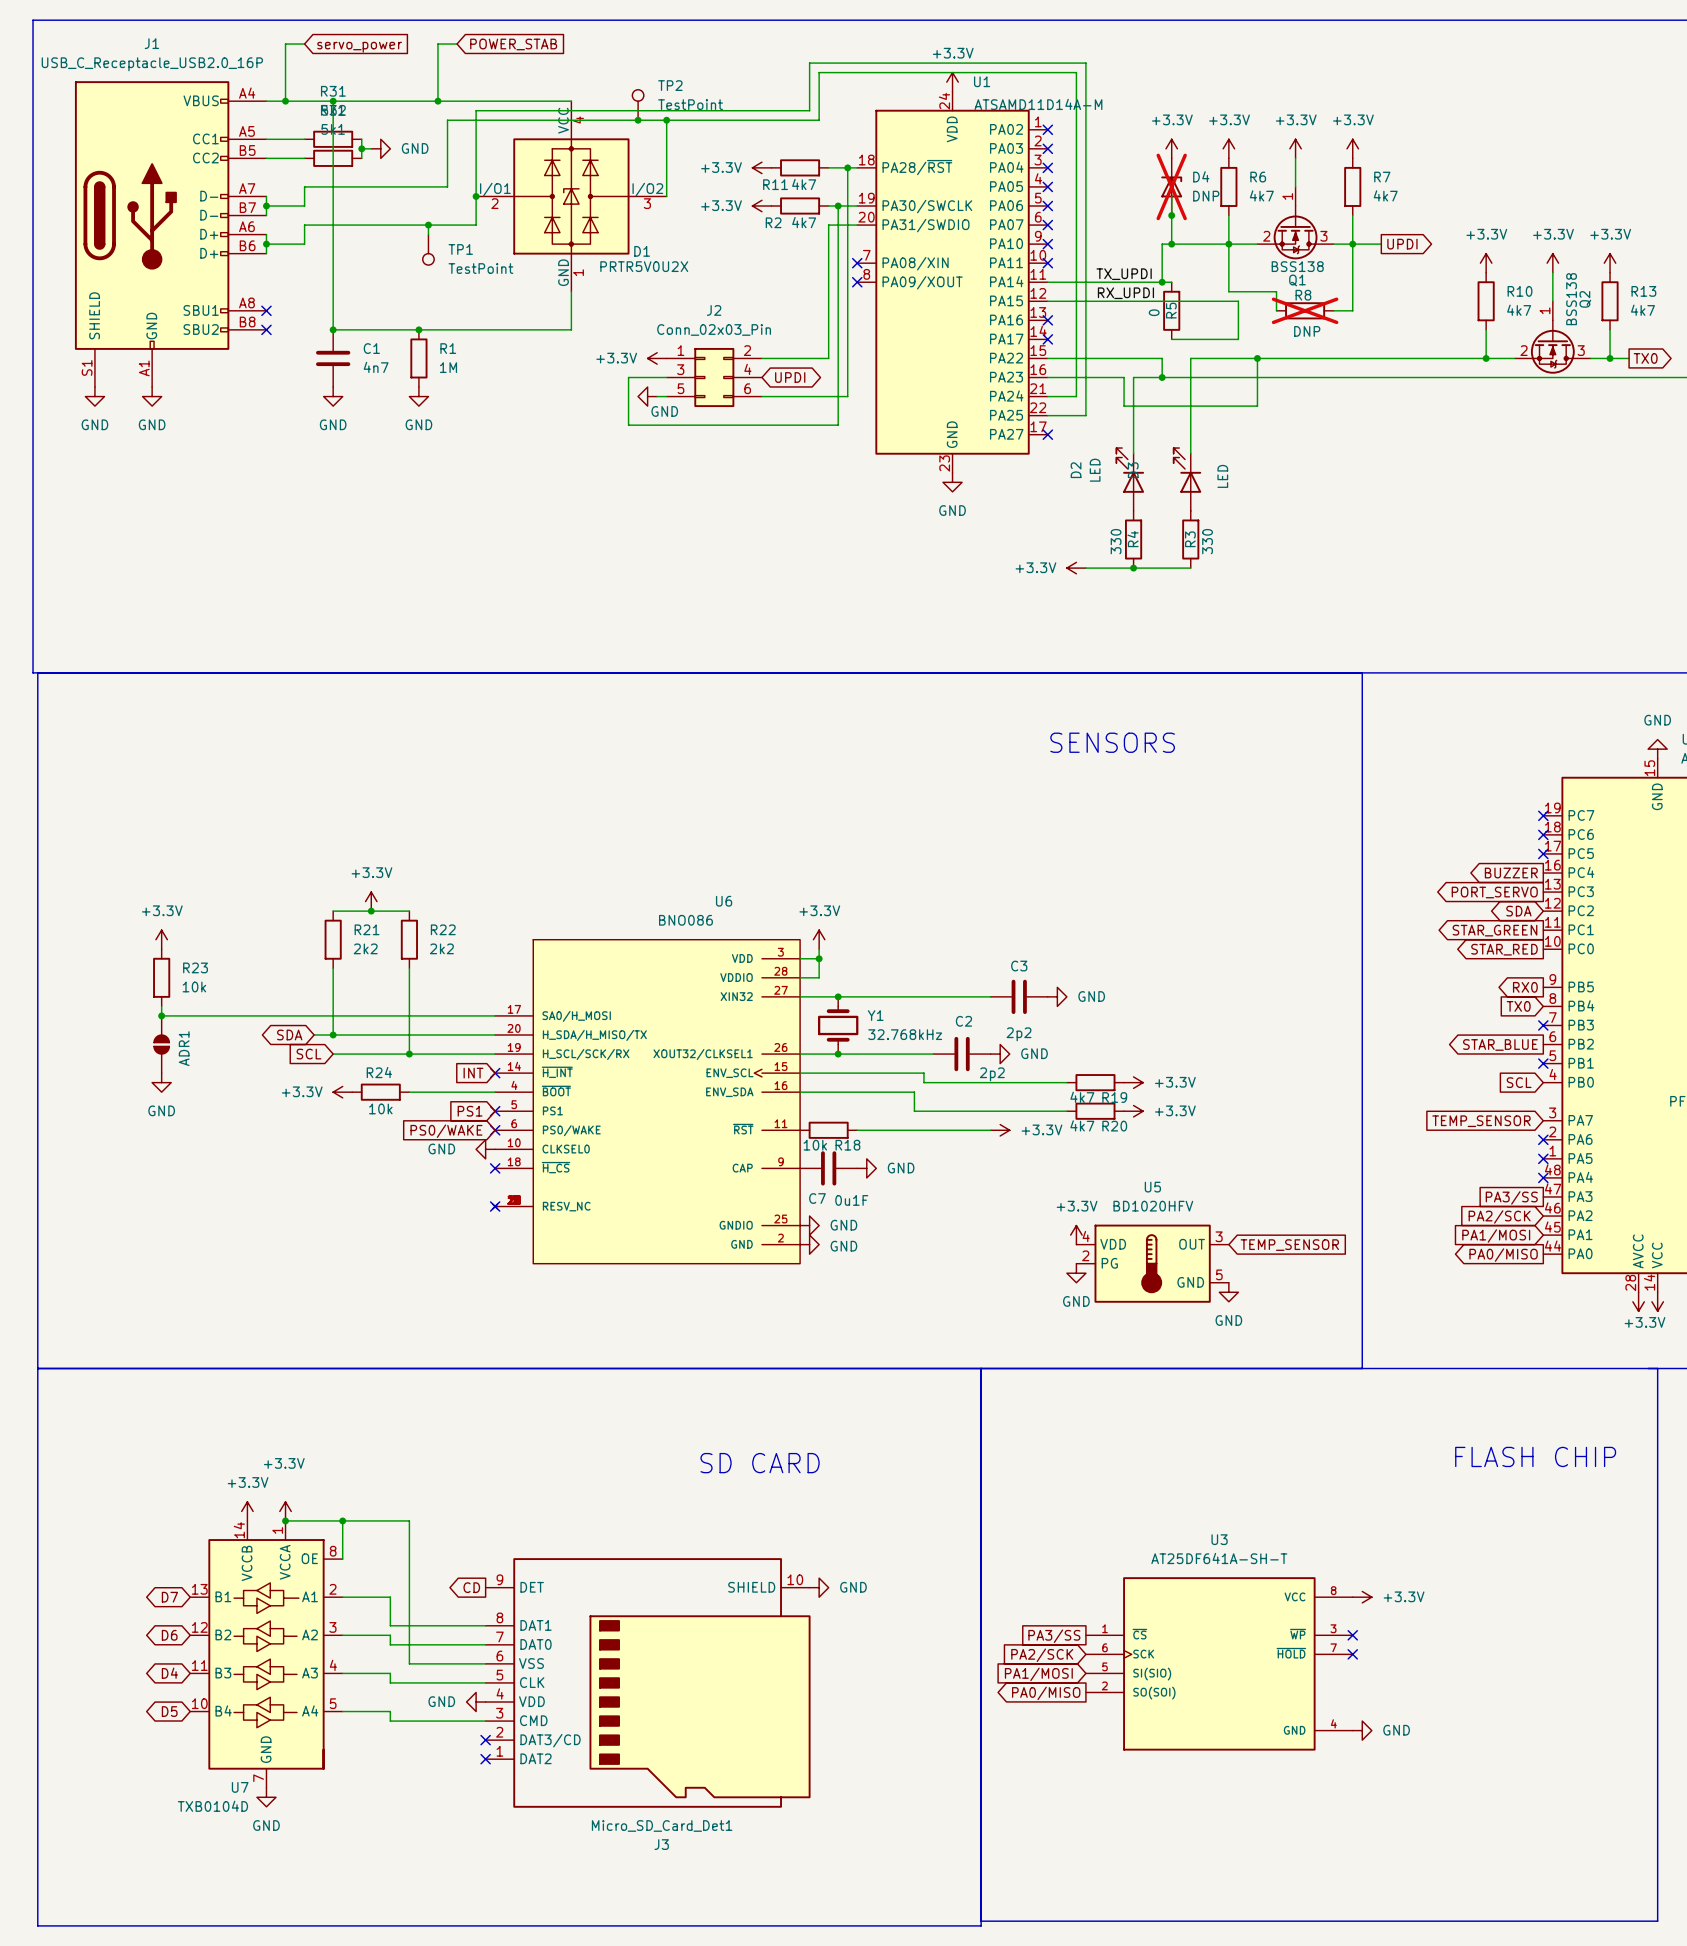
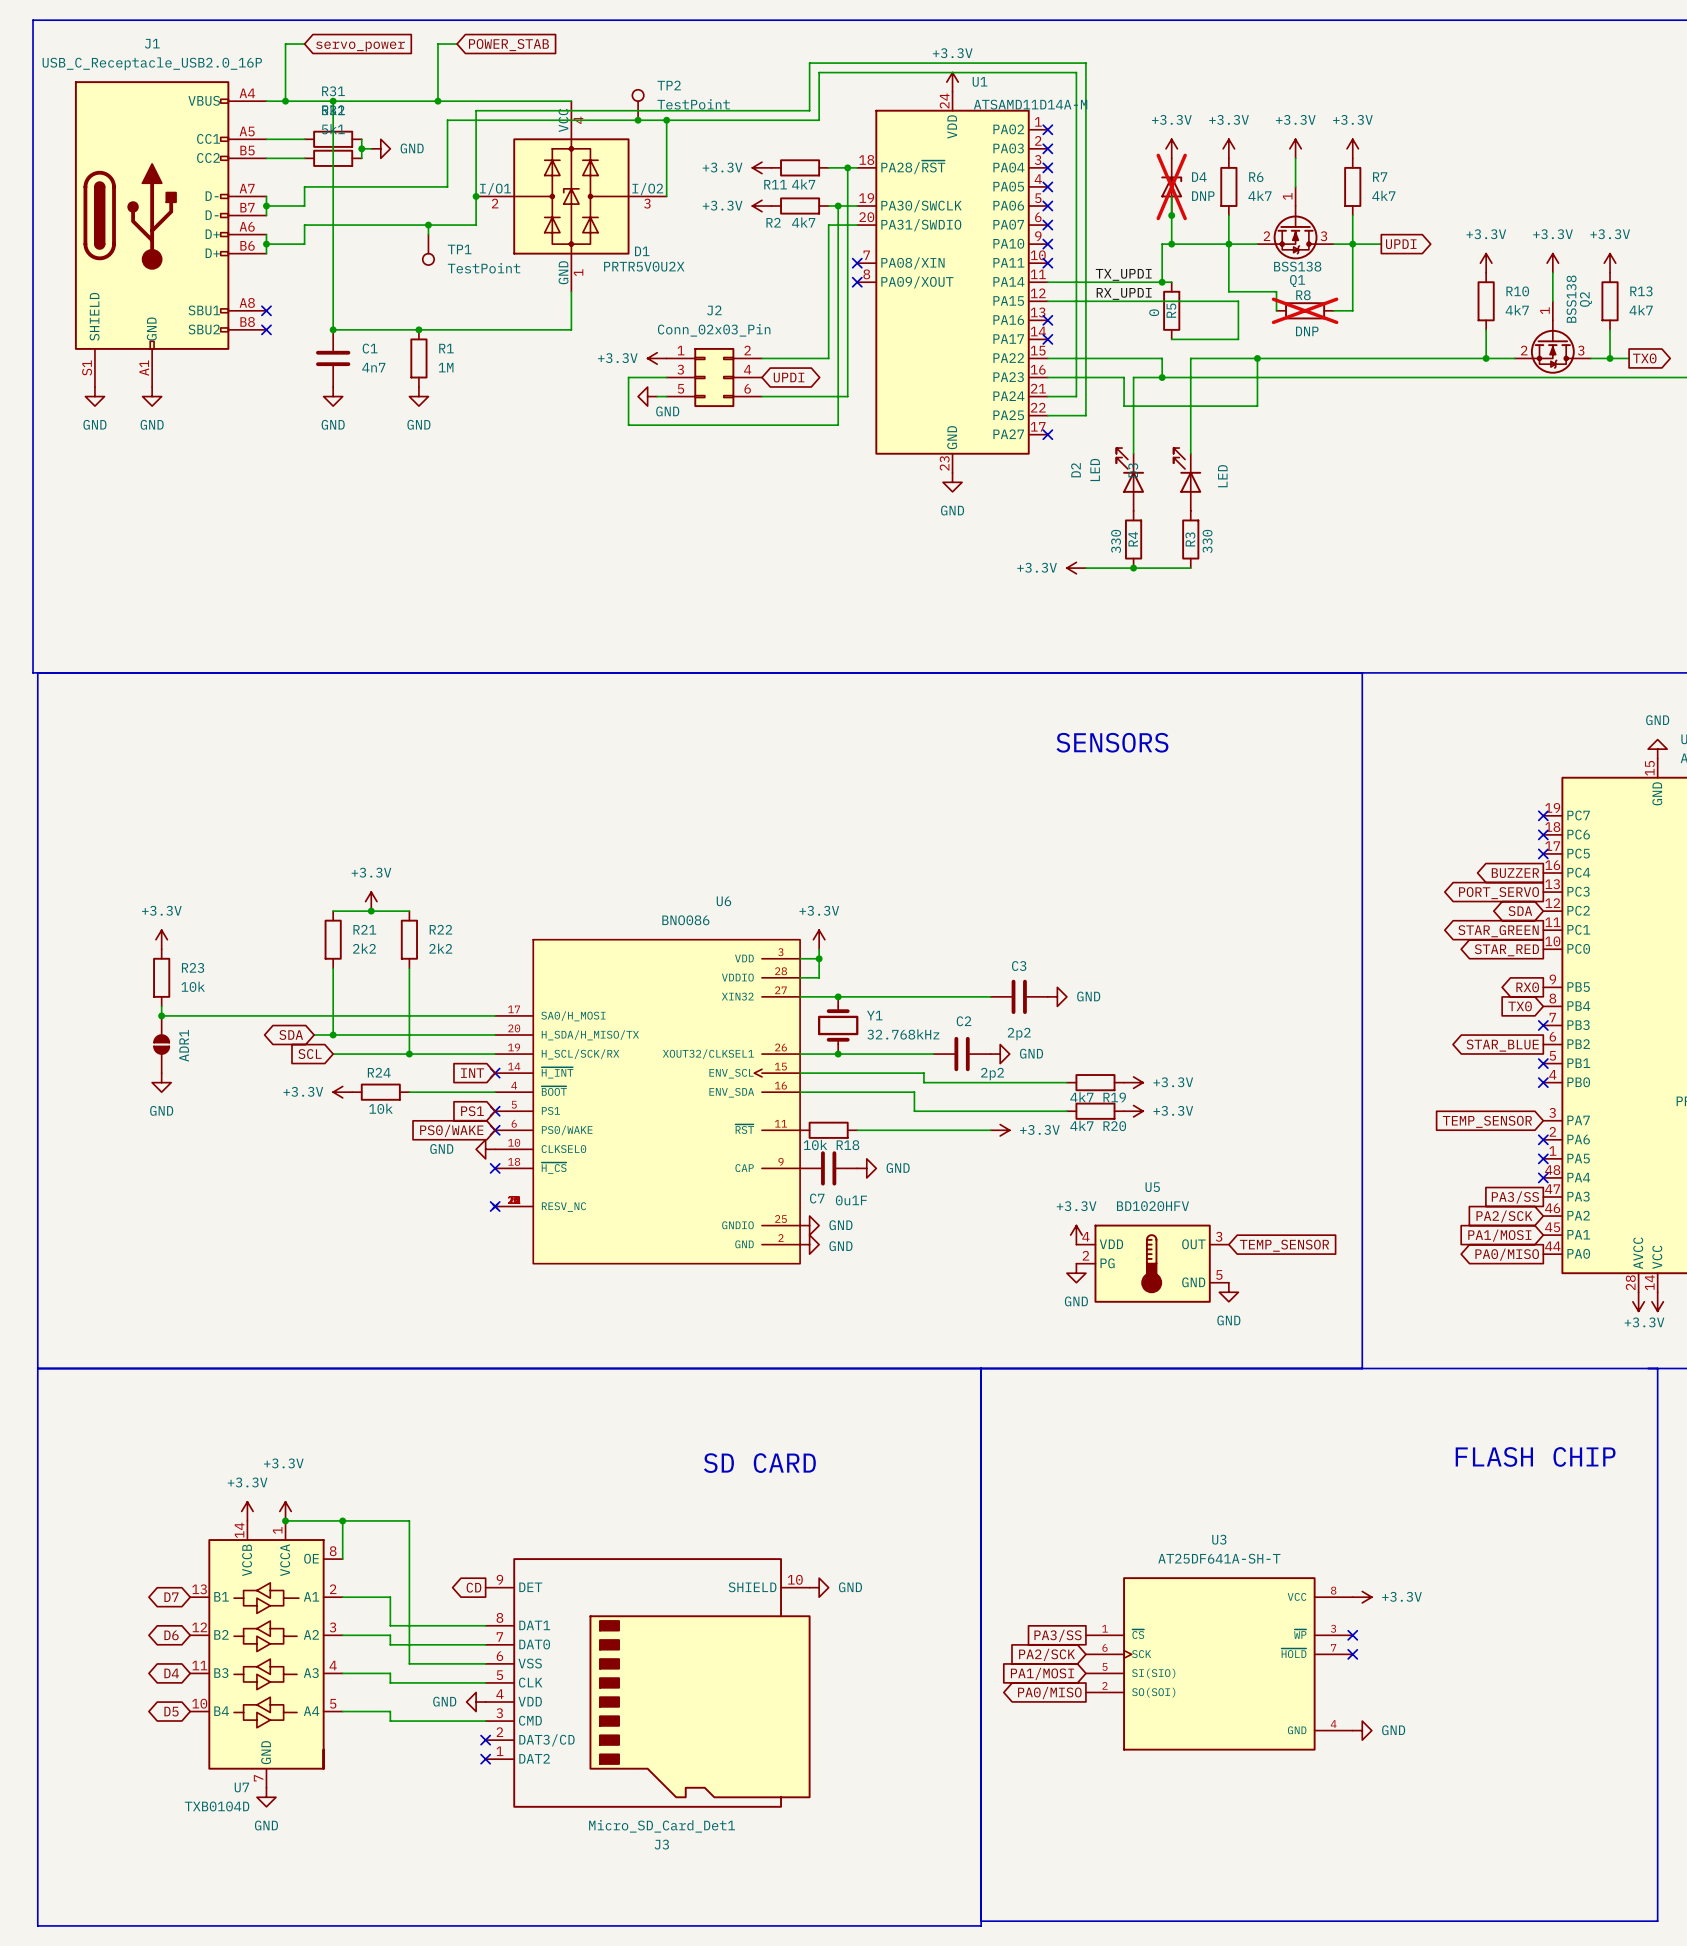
global label: SCL (1519, 1082) -> none
no-connect mark: none -> (1543, 1082)

